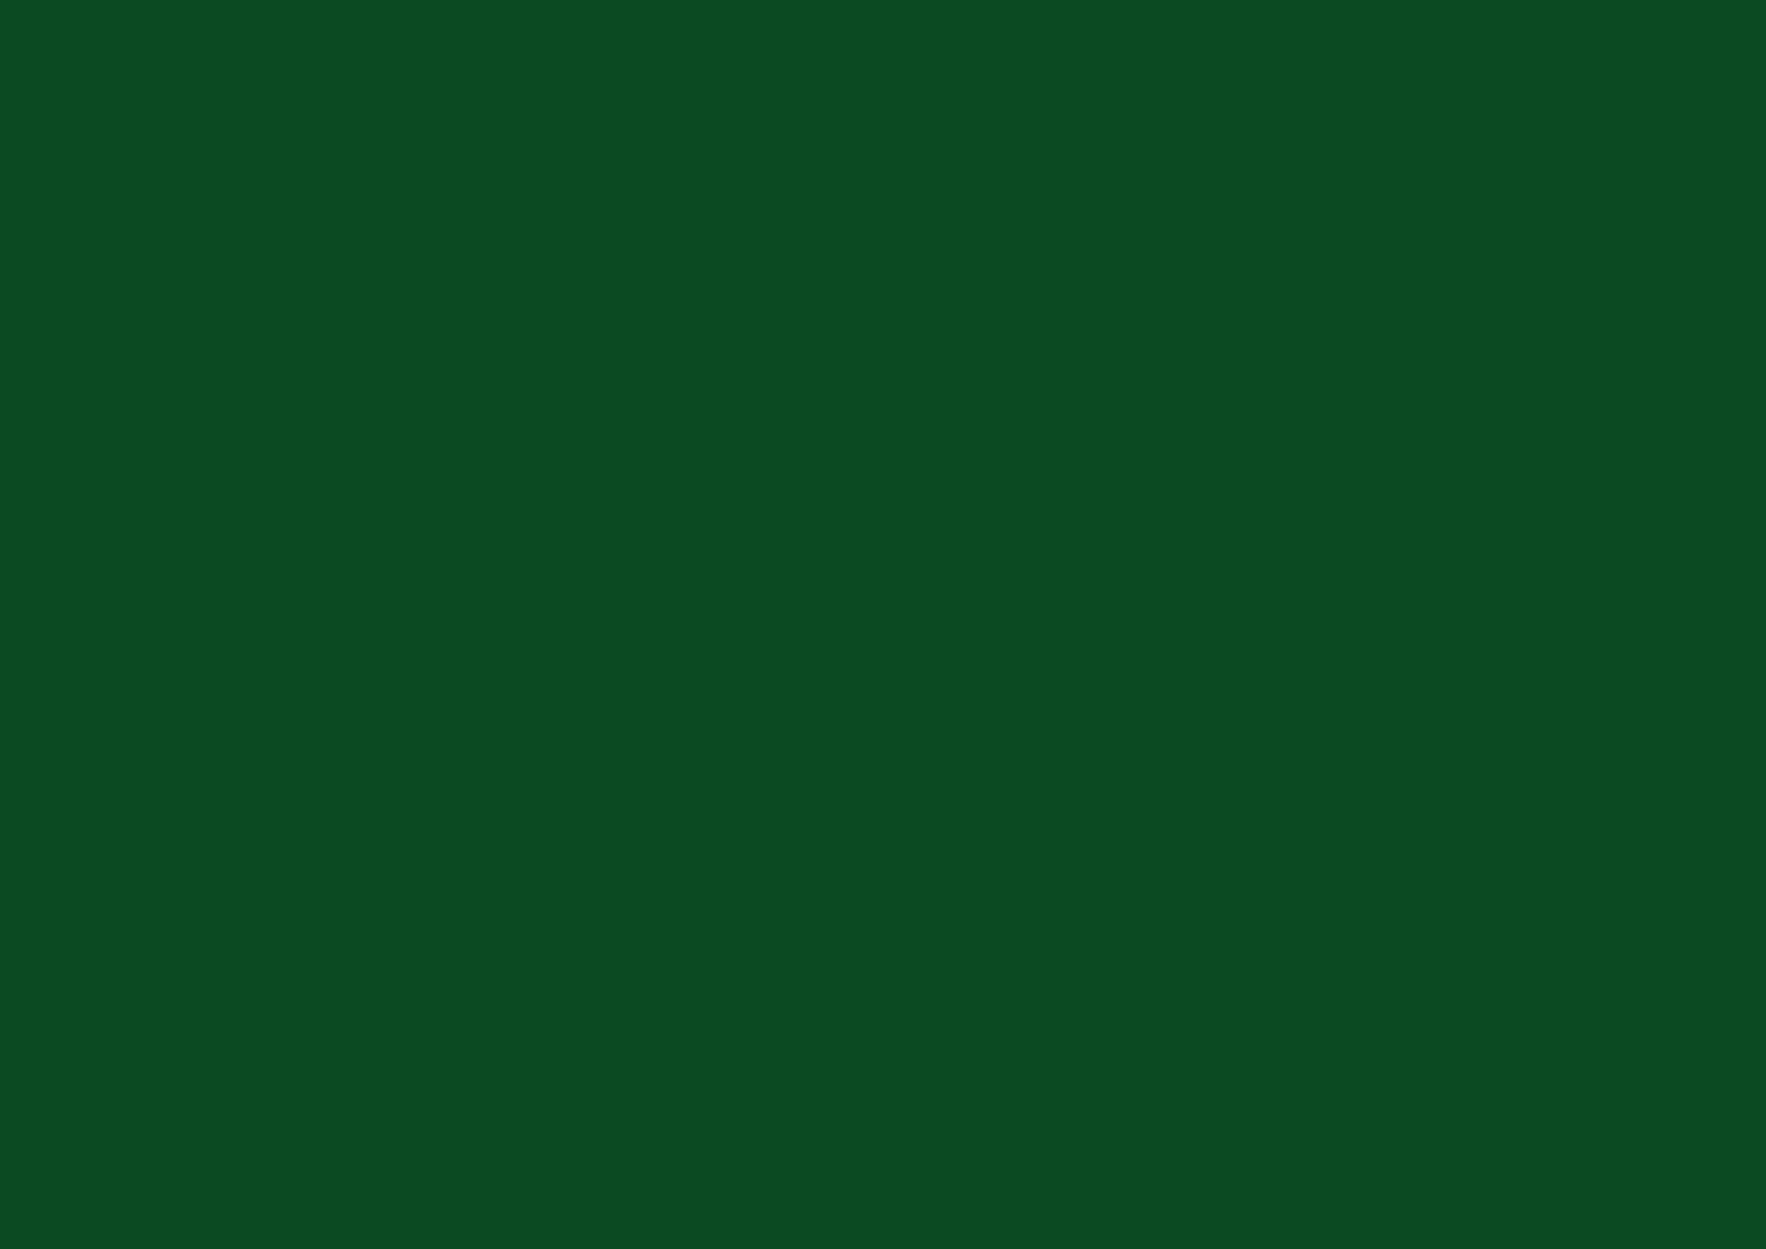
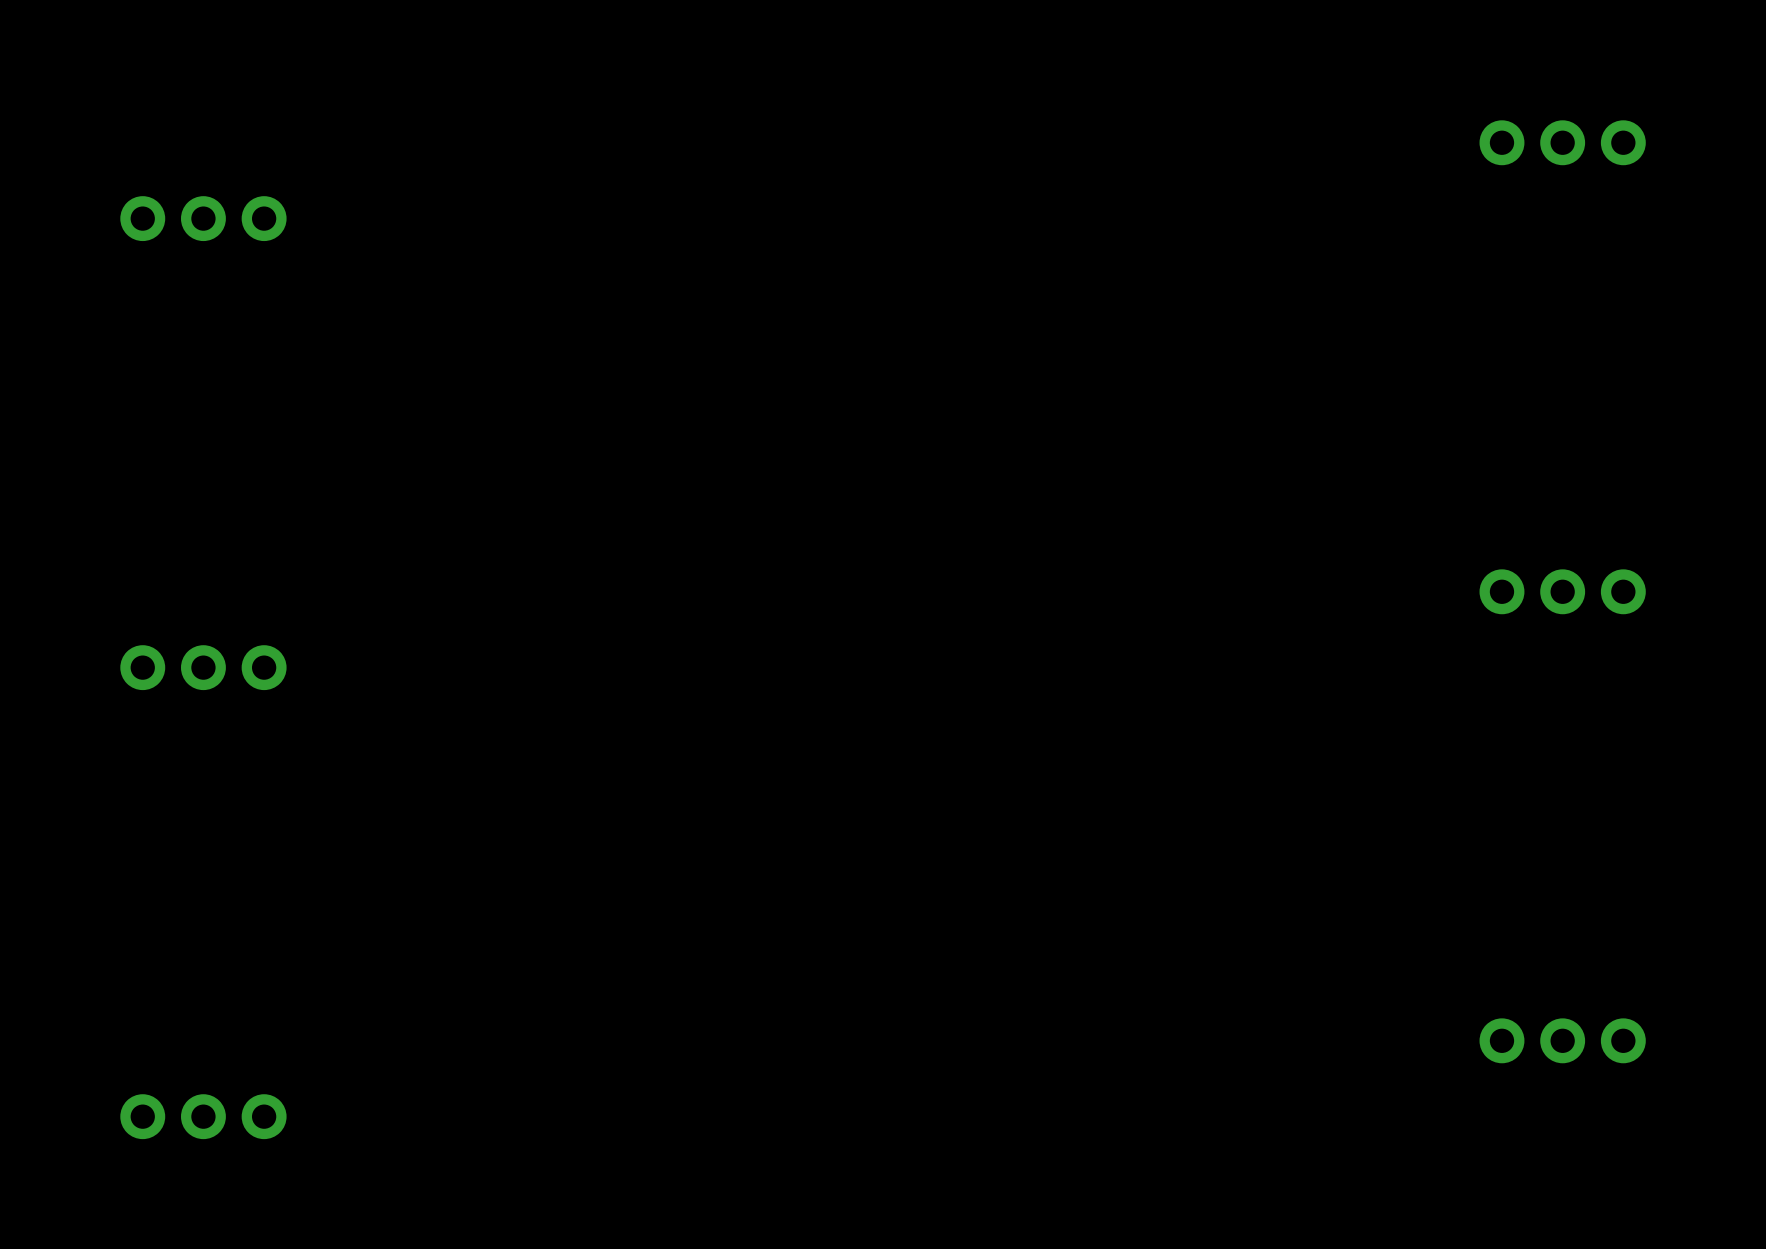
part: none -> (1562, 142)
part: none -> (203, 218)
part: none -> (1562, 591)
part: none -> (203, 667)
part: none -> (1562, 1040)
part: none -> (203, 1116)

